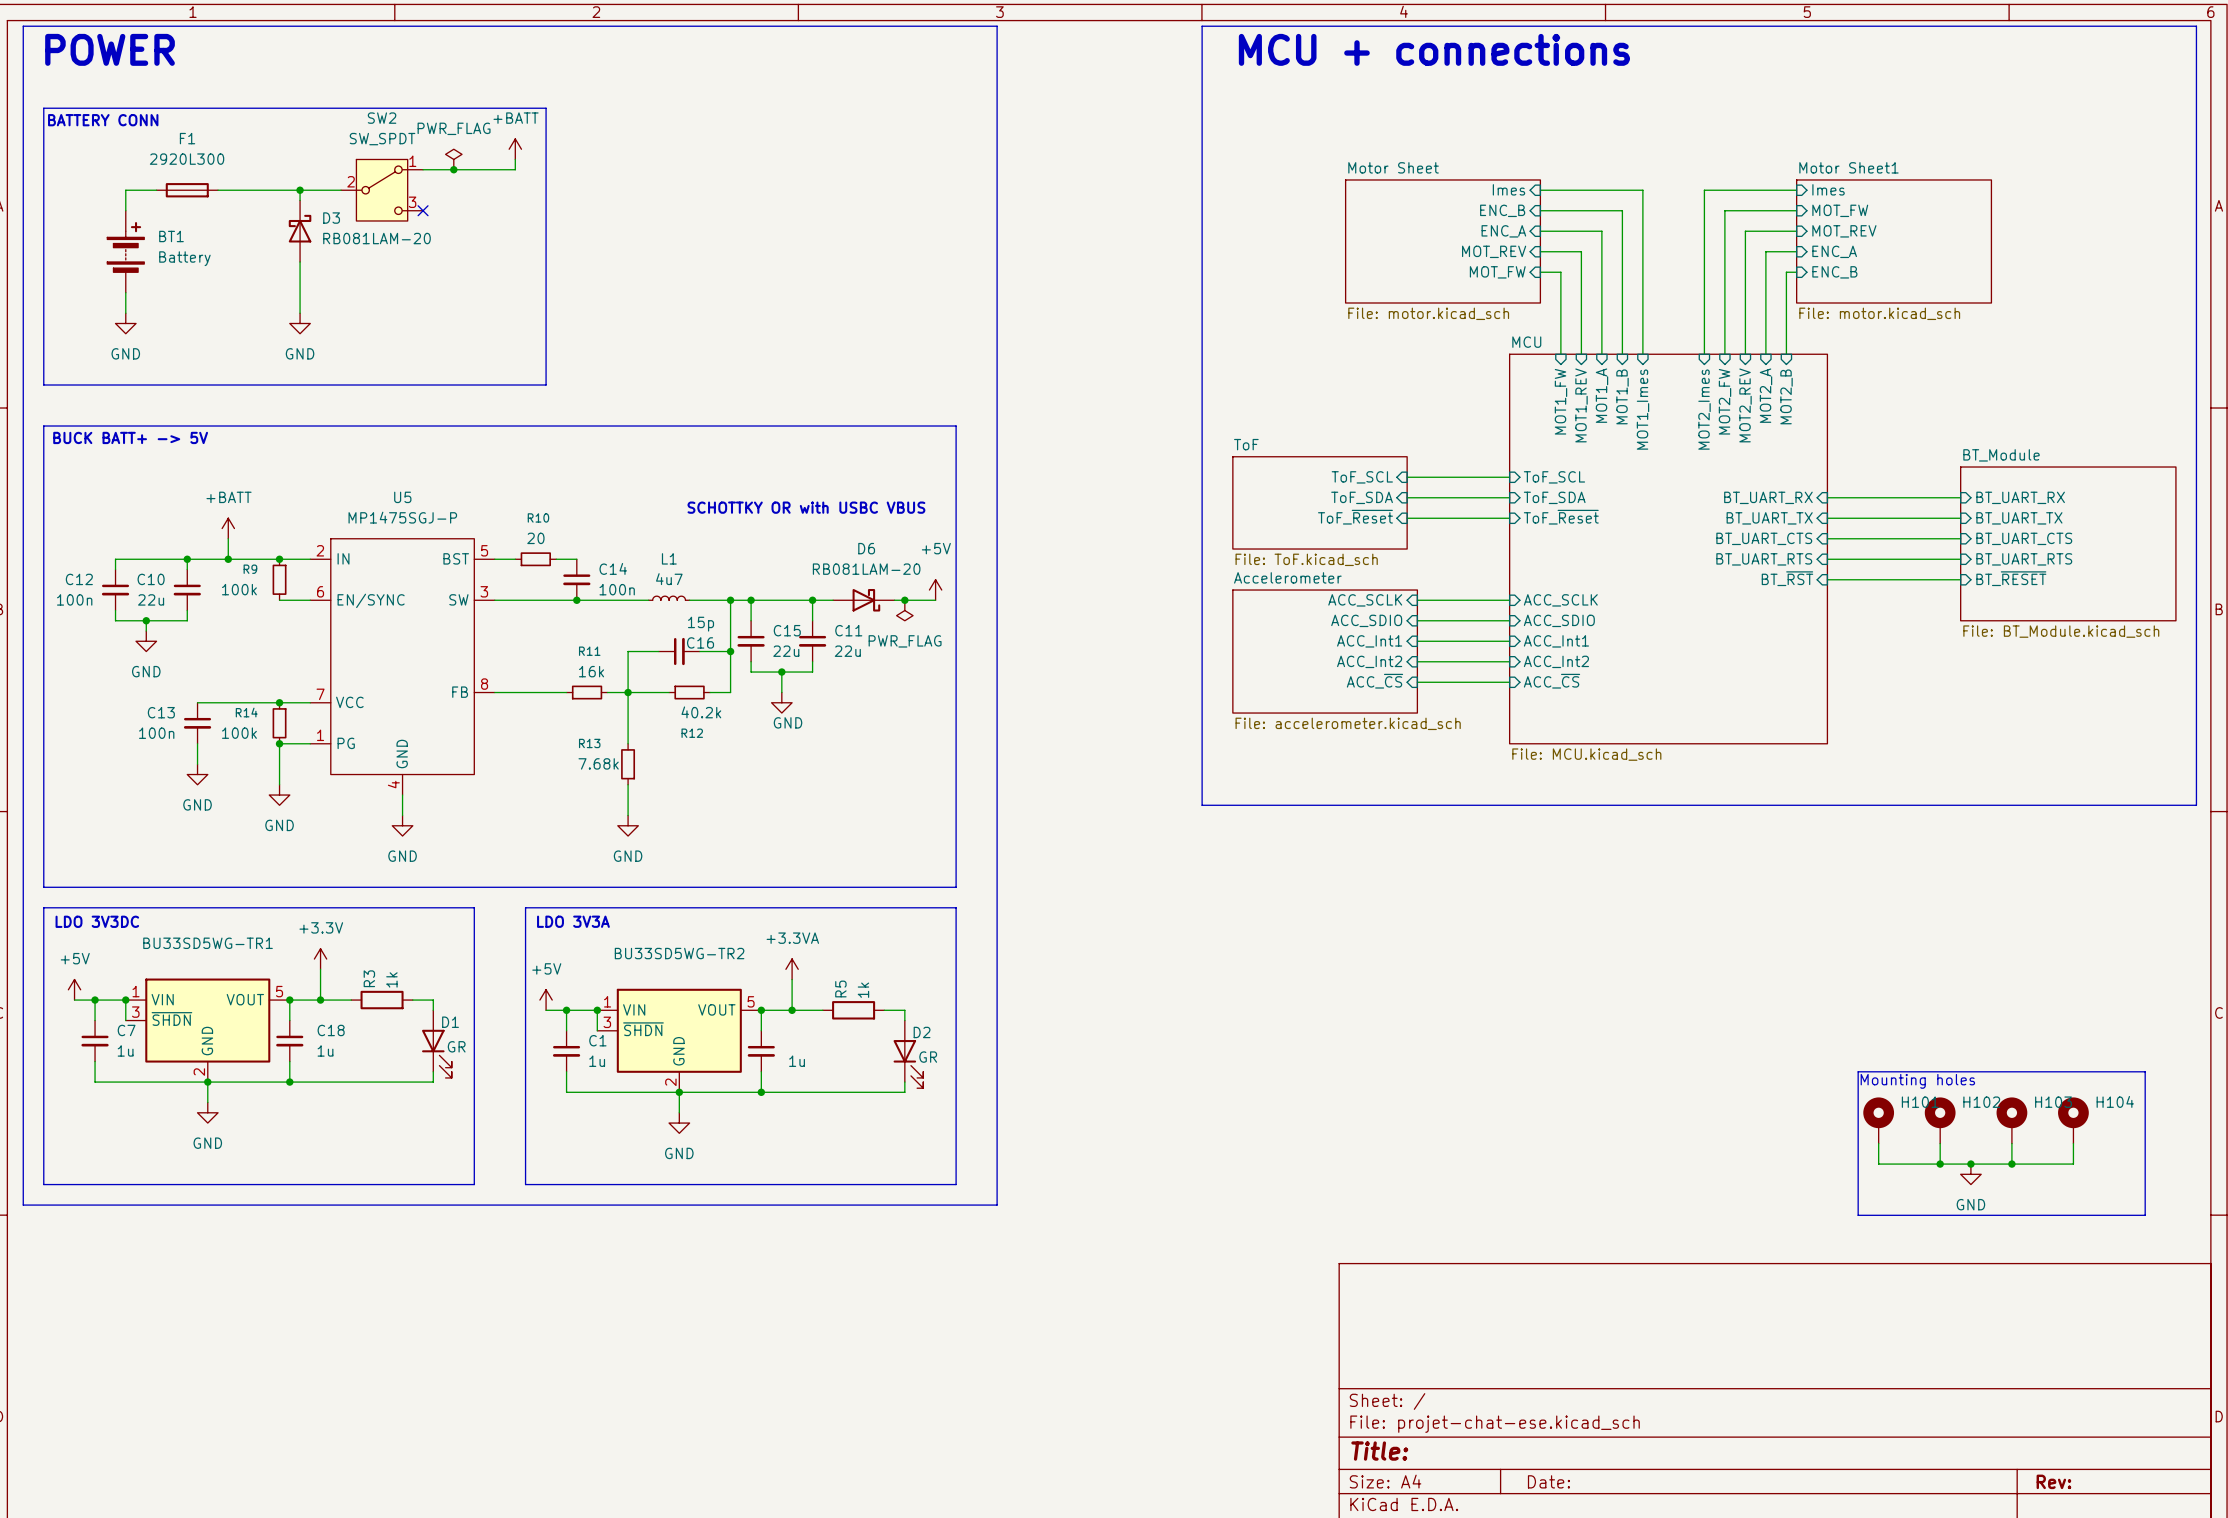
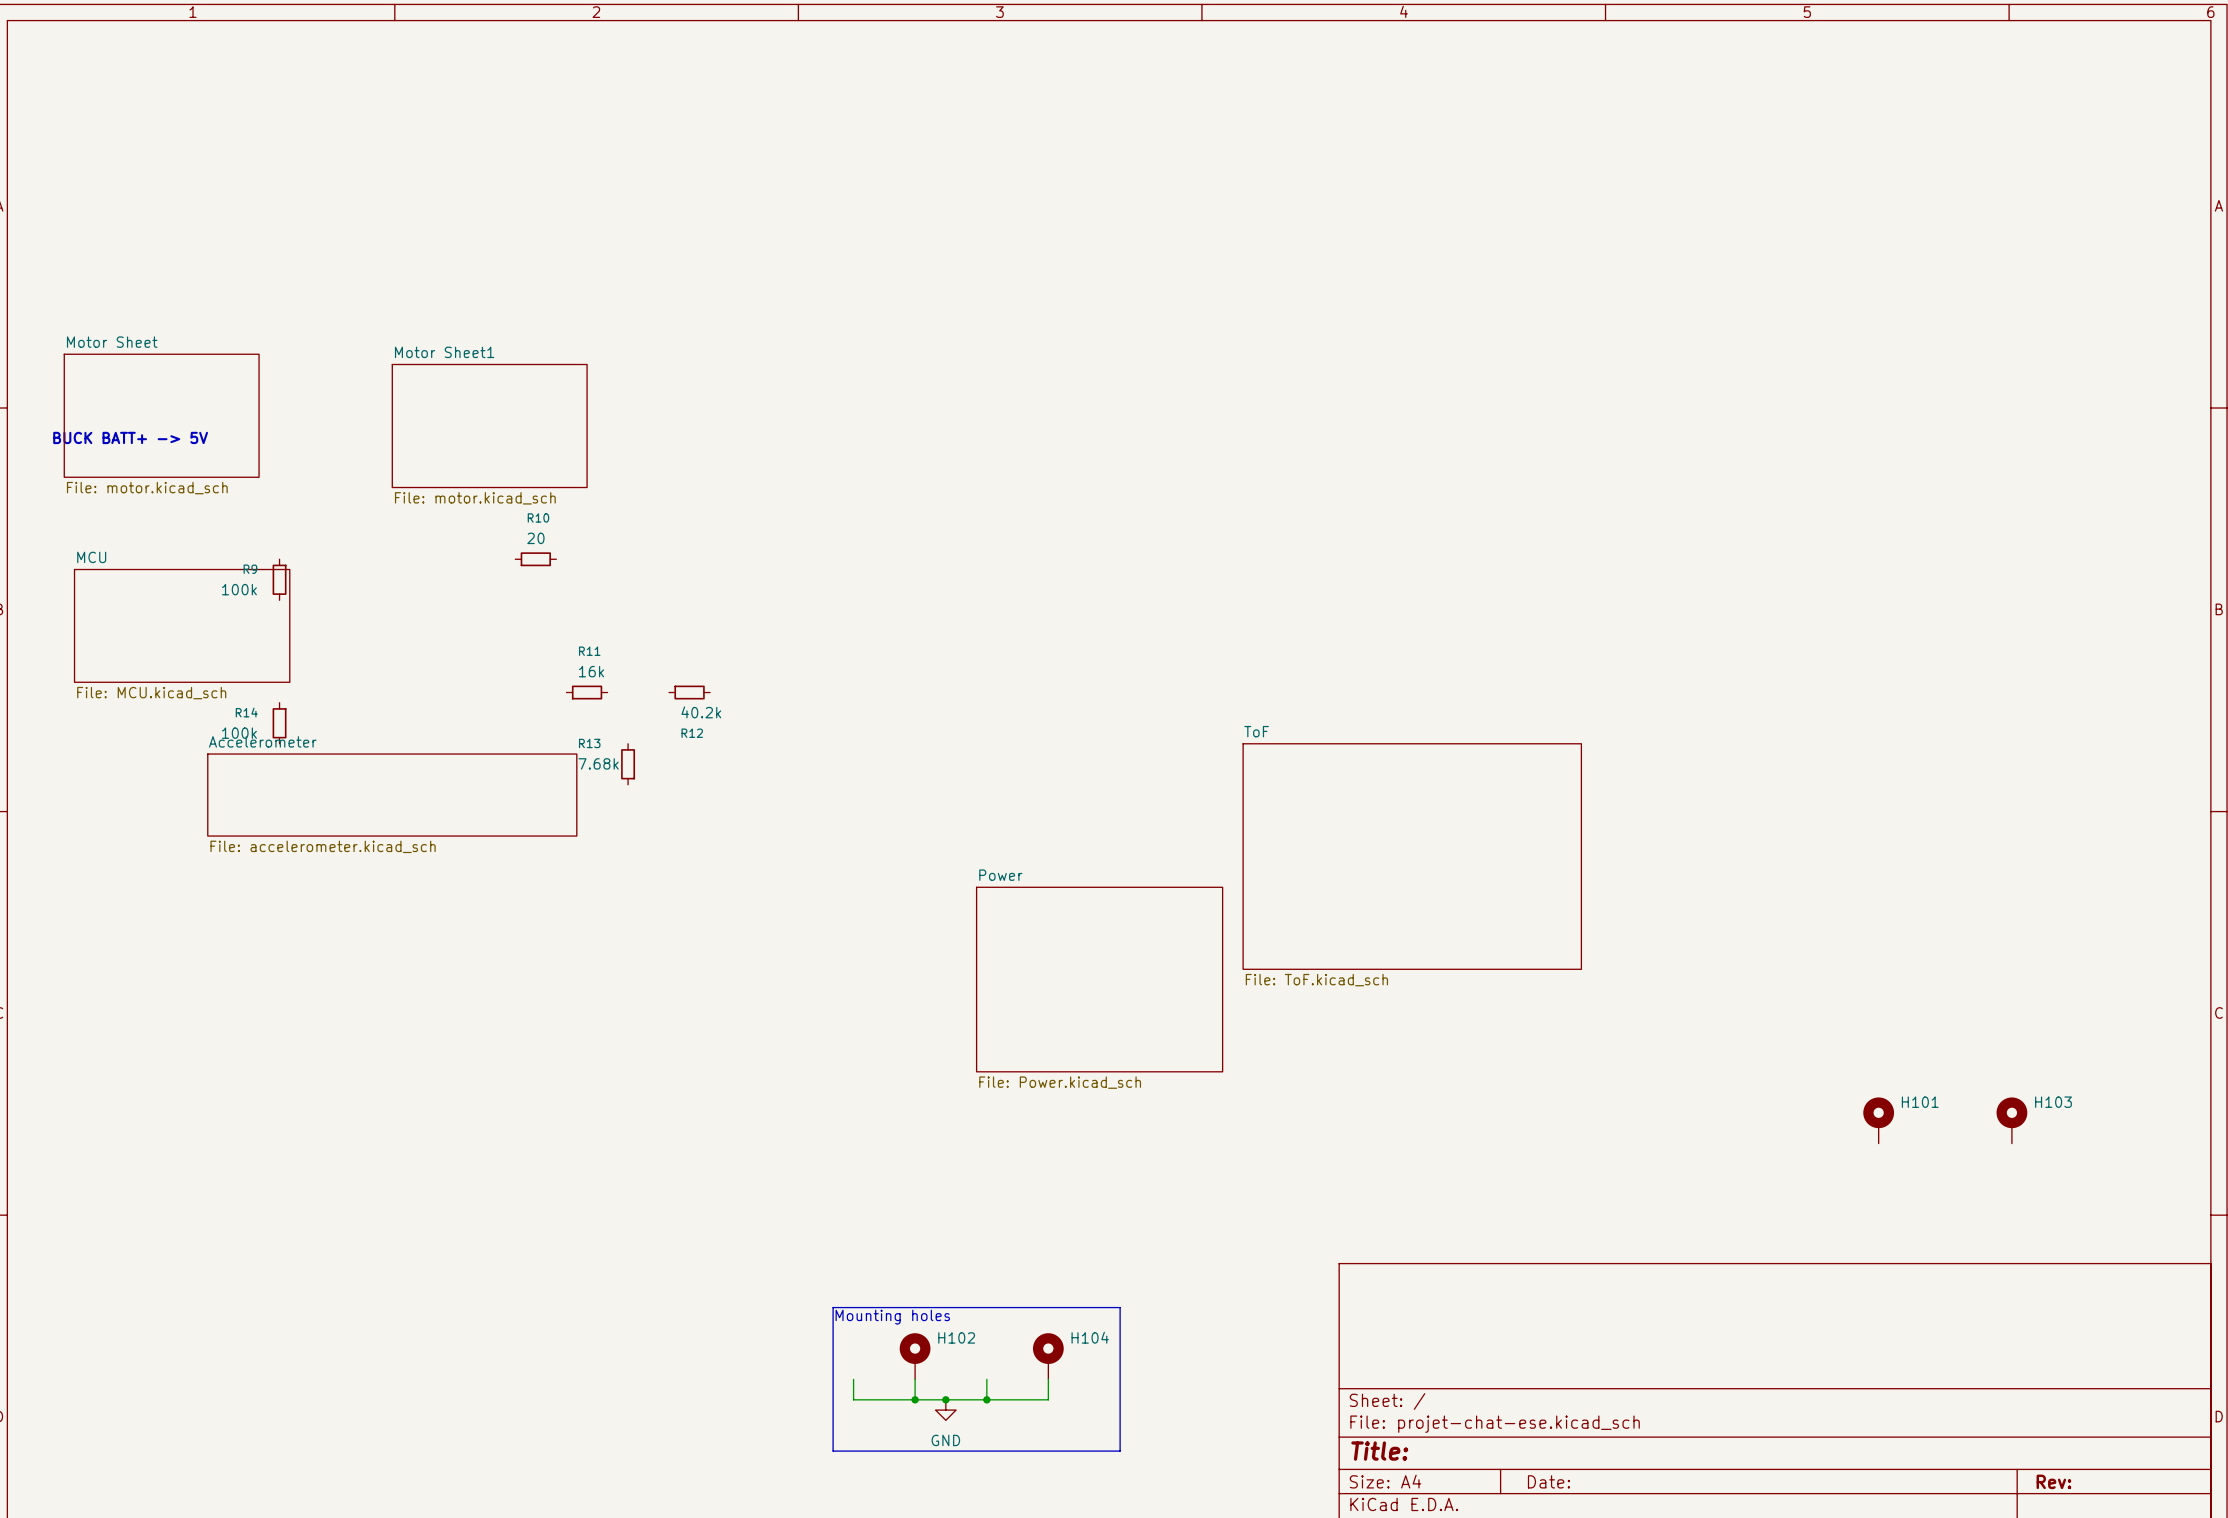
line: (23, 26) (997, 26) (997, 1205) (23, 1205) (23, 26) -> none
line: (1202, 26) (2196, 26) (2196, 805) (1202, 805) (1202, 26) -> none
text: POWER (110, 49) -> none
text: MCU + connections (1434, 49) -> none
line: (43, 108) (546, 108) (546, 385) (43, 385) (43, 108) -> none
text: BATTERY CONN (103, 120) -> none
power symbol: +BATT (515, 149) -> none
power symbol: PWR_FLAG (453, 159) -> none
wire: (515, 159) (515, 169) (423, 169) -> none
junction: (453, 169) -> none
sheet pin: Imes (1508, 189) -> none
sheet pin: Imes (1828, 189) -> none
wire: (156, 190) (125, 190) (125, 210) -> none
F1: 2920L300 (187, 190) -> none
wire: (218, 190) (341, 190) -> none
wire: (300, 190) (300, 200) -> none
junction: (300, 190) -> none
SW2: SW_SPDT (382, 190) -> none
wire: (1540, 190) (1642, 190) (1642, 354) -> none
wire: (1796, 190) (1704, 190) (1704, 354) -> none
no-connect mark: (423, 210) -> none
sheet pin: ENC_B (1502, 210) -> none
wire: (1540, 210) (1622, 210) (1622, 354) -> none
wire: (1796, 210) (1724, 210) (1724, 354) -> none
sheet pin: MOT_FW (1840, 210) -> none
D3: RB081LAM-20 (300, 231) -> none
sheet pin: ENC_A (1503, 231) -> none
wire: (1540, 231) (1601, 231) (1601, 354) -> none
wire: (1796, 231) (1745, 231) (1745, 354) -> none
sheet pin: MOT_REV (1844, 231) -> none
sheet Motor Sheet: File: motor.kicad_sch (1443, 241) -> none
sheet Motor Sheet1 position: (1894, 241) -> (489, 426)
BT1: Battery (125, 251) -> none
sheet pin: MOT_REV (1494, 251) -> none
wire: (1540, 251) (1581, 251) (1581, 354) -> none
wire: (1796, 251) (1765, 251) (1765, 354) -> none
sheet pin: ENC_A (1834, 251) -> none
wire: (300, 261) (300, 313) -> none
sheet pin: MOT_FW (1497, 272) -> none
wire: (1540, 272) (1560, 272) (1560, 354) -> none
wire: (1796, 272) (1786, 272) (1786, 354) -> none
sheet pin: ENC_B (1834, 272) -> none
wire: (125, 292) (125, 313) -> none
power symbol: GND (125, 323) -> none
power symbol: GND (300, 323) -> none
sheet pin: MOT1_A (1602, 395) -> none
sheet pin: MOT2_A (1766, 395) -> none
sheet pin: MOT1_B (1622, 396) -> none
sheet pin: MOT2_B (1786, 396) -> none
sheet pin: MOT1_FW (1560, 401) -> none
sheet pin: MOT2_FW (1725, 401) -> none
sheet pin: MOT1_REV (1581, 405) -> none
sheet pin: MOT2_REV (1745, 405) -> none
sheet pin: MOT1_Imes (1643, 409) -> none
sheet pin: MOT2_Imes (1704, 409) -> none
sheet Motor Sheet: none -> File: motor.kicad_sch (161, 415)
line: (43, 426) (43, 887) (956, 887) (956, 426) (43, 426) -> none
sheet pin: ToF_SCL (1362, 477) -> none
wire: (1407, 477) (1509, 477) -> none
sheet pin: ToF_SCL (1554, 477) -> none
sheet pin: ToF_SDA (1362, 497) -> none
wire: (1407, 497) (1509, 497) -> none
sheet pin: ToF_SDA (1554, 497) -> none
sheet pin: BT_UART_RX (1768, 497) -> none
wire: (1827, 497) (1960, 497) -> none
sheet pin: BT_UART_RX (2020, 497) -> none
sheet ToF: File: ToF.kicad_sch (1320, 502) -> none
text: SCHOTTKY OR with USBC VBUS (806, 507) -> none
sheet pin: ToF_~{Reset} (1355, 517) -> none
sheet pin: ToF_~{Reset} (1561, 517) -> none
wire: (1407, 518) (1509, 518) -> none
sheet pin: BT_UART_TX (1769, 518) -> none
wire: (1827, 518) (1960, 518) -> none
sheet pin: BT_UART_TX (2019, 518) -> none
power symbol: +BATT (228, 528) -> none
wire: (228, 538) (228, 559) -> none
sheet pin: BT_UART_CTS (1764, 538) -> none
wire: (1827, 538) (1960, 538) -> none
sheet pin: BT_UART_CTS (2024, 538) -> none
sheet BT_Module: File: BT_Module.kicad_sch (2068, 543) -> none
sheet MCU: File: MCU.kicad_sch (1668, 549) -> none
wire: (187, 559) (187, 569) -> none
junction: (187, 559) -> none
junction: (228, 559) -> none
junction: (279, 559) -> none
wire: (310, 559) (115, 559) (115, 569) -> none
wire: (494, 559) (515, 559) -> none
wire: (556, 559) (576, 559) -> none
sheet pin: BT_UART_RTS (1764, 559) -> none
wire: (1827, 559) (1960, 559) -> none
sheet pin: BT_UART_RTS (2024, 559) -> none
sheet pin: BT_~{RST} (1787, 578) -> none
sheet pin: BT_~{RESET} (2011, 578) -> none
C14: 100n (576, 579) -> none
wire: (1827, 579) (1960, 579) -> none
C12: 100n (115, 590) -> none
C10: 22u (187, 590) -> none
power symbol: +5V (935, 590) -> none
L1: 4u7 (669, 598) -> none
wire: (279, 600) (310, 600) -> none
wire: (494, 600) (648, 600) -> none
junction: (576, 600) -> none
wire: (689, 600) (833, 600) -> none
wire: (730, 600) (730, 692) (710, 692) -> none
junction: (730, 600) -> none
wire: (751, 600) (751, 620) -> none
junction: (751, 600) -> none
wire: (812, 600) (812, 620) -> none
junction: (812, 600) -> none
D6: RB081LAM-20 (863, 600) -> none
wire: (894, 600) (935, 600) -> none
junction: (904, 600) -> none
sheet pin: ACC_SCLK (1365, 600) -> none
wire: (1417, 600) (1509, 600) -> none
sheet pin: ACC_SCLK (1560, 600) -> none
wire: (115, 610) (115, 620) (187, 620) (187, 610) -> none
power symbol: PWR_FLAG (904, 610) -> none
wire: (146, 620) (146, 631) -> none
junction: (146, 620) -> none
sheet pin: ACC_SDIO (1366, 620) -> none
wire: (1417, 620) (1509, 620) -> none
sheet pin: ACC_SDIO (1559, 620) -> none
sheet MCU: none -> File: MCU.kicad_sch (182, 625)
power symbol: GND (146, 641) -> none
C15: 22u (751, 641) -> none
C11: 22u (812, 641) -> none
sheet pin: ACC_Int1 (1369, 641) -> none
wire: (1417, 641) (1509, 641) -> none
sheet pin: ACC_Int1 (1556, 641) -> none
wire: (658, 651) (628, 651) (628, 743) -> none
C16: 15p (679, 651) -> none
wire: (699, 651) (730, 651) -> none
junction: (730, 651) -> none
sheet Accelerometer: File: accelerometer.kicad_sch (1325, 651) -> none
wire: (751, 661) (751, 672) (812, 672) (812, 661) -> none
sheet pin: ACC_Int2 (1369, 661) -> none
wire: (1417, 661) (1509, 661) -> none
sheet pin: ACC_Int2 (1556, 661) -> none
U5: MP1475SGJ-P (402, 666) -> none
wire: (781, 672) (781, 692) -> none
junction: (781, 672) -> none
sheet pin: ACC_~{CS} (1374, 681) -> none
sheet pin: ACC_~{CS} (1551, 681) -> none
wire: (1417, 682) (1509, 682) -> none
wire: (494, 692) (566, 692) -> none
wire: (607, 692) (669, 692) -> none
junction: (628, 692) -> none
wire: (197, 702) (310, 702) -> none
junction: (279, 702) -> none
power symbol: GND (781, 702) -> none
C13: 100n (197, 723) -> none
wire: (197, 743) (197, 764) -> none
junction: (279, 743) -> none
wire: (310, 743) (279, 743) (279, 784) -> none
power symbol: GND (197, 774) -> none
wire: (628, 784) (628, 815) -> none
power symbol: GND (279, 795) -> none
sheet Accelerometer: none -> File: accelerometer.kicad_sch (392, 795)
wire: (402, 795) (402, 815) -> none
power symbol: GND (402, 825) -> none
power symbol: GND (628, 825) -> none
sheet ToF: none -> File: ToF.kicad_sch (1412, 856)
line: (43, 907) (43, 1184) (474, 1184) (474, 907) (43, 907) -> none
line: (525, 907) (956, 907) (956, 1184) (525, 1184) (525, 907) -> none
text: LDO 3V3DC (97, 921) -> none
text: LDO 3V3A (573, 921) -> none
power symbol: +3.3V (320, 959) -> none
wire: (320, 969) (320, 1000) -> none
power symbol: +3.3VA (792, 969) -> none
wire: (792, 979) (792, 1010) -> none
sheet Power: none -> File: Power.kicad_sch (1099, 979)
power symbol: +5V (74, 989) -> none
wire: (74, 1000) (125, 1000) (125, 1020) -> none
wire: (95, 1000) (95, 1020) -> none
junction: (95, 1000) -> none
junction: (125, 1000) -> none
junction: (289, 1000) -> none
junction: (320, 1000) -> none
wire: (351, 1000) (289, 1000) (289, 1020) -> none
R3: 1k (382, 1000) -> none
wire: (412, 1000) (433, 1000) (433, 1010) -> none
power symbol: +5V (546, 1000) -> none
wire: (546, 1010) (597, 1010) (597, 1030) -> none
wire: (566, 1010) (566, 1030) -> none
junction: (566, 1010) -> none
junction: (597, 1010) -> none
junction: (761, 1010) -> none
junction: (792, 1010) -> none
wire: (822, 1010) (761, 1010) (761, 1030) -> none
R5: 1k (853, 1010) -> none
wire: (884, 1010) (904, 1010) (904, 1020) -> none
BU33SD5WG-TR1: (207, 1030) -> none
BU33SD5WG-TR2: (679, 1040) -> none
C7: 1u (95, 1041) -> none
C18: 1u (289, 1041) -> none
D1: GR (436, 1044) -> none
C1: 1u (566, 1051) -> none
part: 1u (761, 1051) -> none
D2: GR (908, 1054) -> none
wire: (95, 1061) (95, 1082) (433, 1082) (433, 1071) -> none
wire: (289, 1061) (289, 1082) -> none
wire: (566, 1071) (566, 1092) (904, 1092) (904, 1082) -> none
wire: (761, 1071) (761, 1092) -> none
line: (1858, 1071) (2145, 1071) (2145, 1215) (1858, 1215) (1858, 1071) -> none
text: Mounting holes (1917, 1081) -> none
wire: (207, 1082) (207, 1102) -> none
junction: (207, 1082) -> none
junction: (289, 1082) -> none
wire: (679, 1092) (679, 1112) -> none
junction: (679, 1092) -> none
junction: (761, 1092) -> none
power symbol: GND (207, 1112) -> none
H102 position: (1940, 1120) -> (915, 1356)
H104 position: (2073, 1120) -> (1048, 1356)
power symbol: GND (679, 1123) -> none
wire: (1878, 1143) (1878, 1164) (2073, 1164) (2073, 1143) -> none
wire: (1940, 1143) (1940, 1164) -> none
wire: (2011, 1143) (2011, 1164) -> none
junction: (1940, 1164) -> none
junction: (1970, 1164) -> none
junction: (2011, 1164) -> none
power symbol: GND (1970, 1174) -> none
line: none -> (833, 1307) (1120, 1307) (1120, 1451) (833, 1451) (833, 1307)
text: none -> Mounting holes (892, 1317)
wire: none -> (853, 1379) (853, 1399) (1048, 1399) (1048, 1379)
wire: none -> (915, 1379) (915, 1399)
wire: none -> (986, 1379) (986, 1399)
junction: none -> (915, 1399)
junction: none -> (945, 1399)
junction: none -> (986, 1399)
power symbol: none -> GND (945, 1410)

